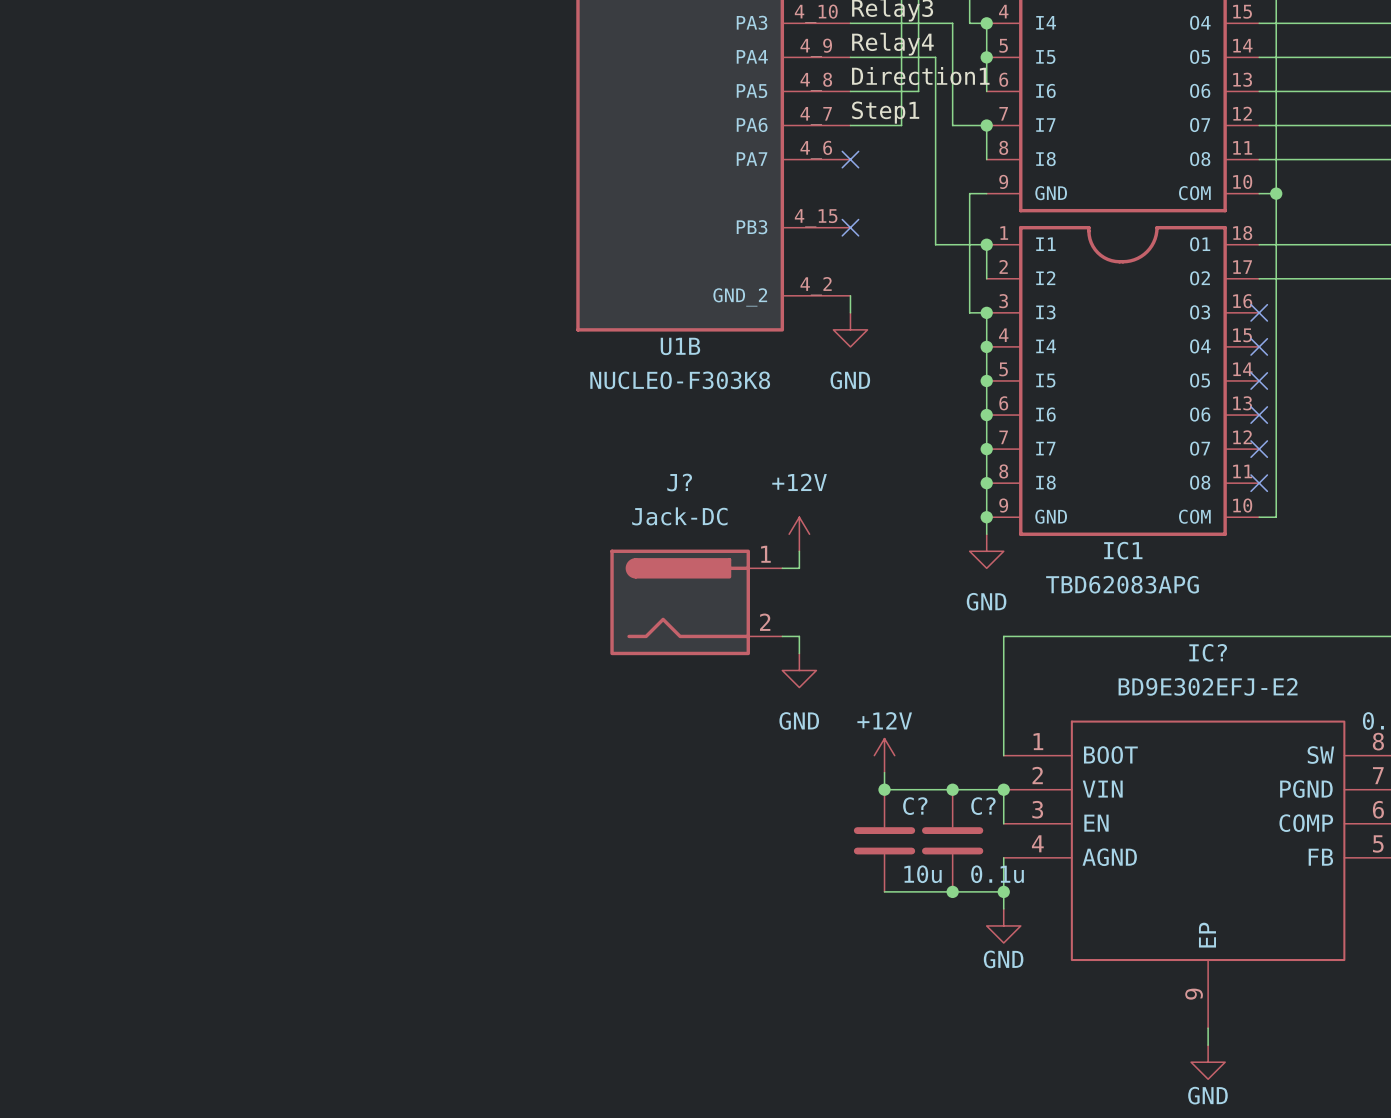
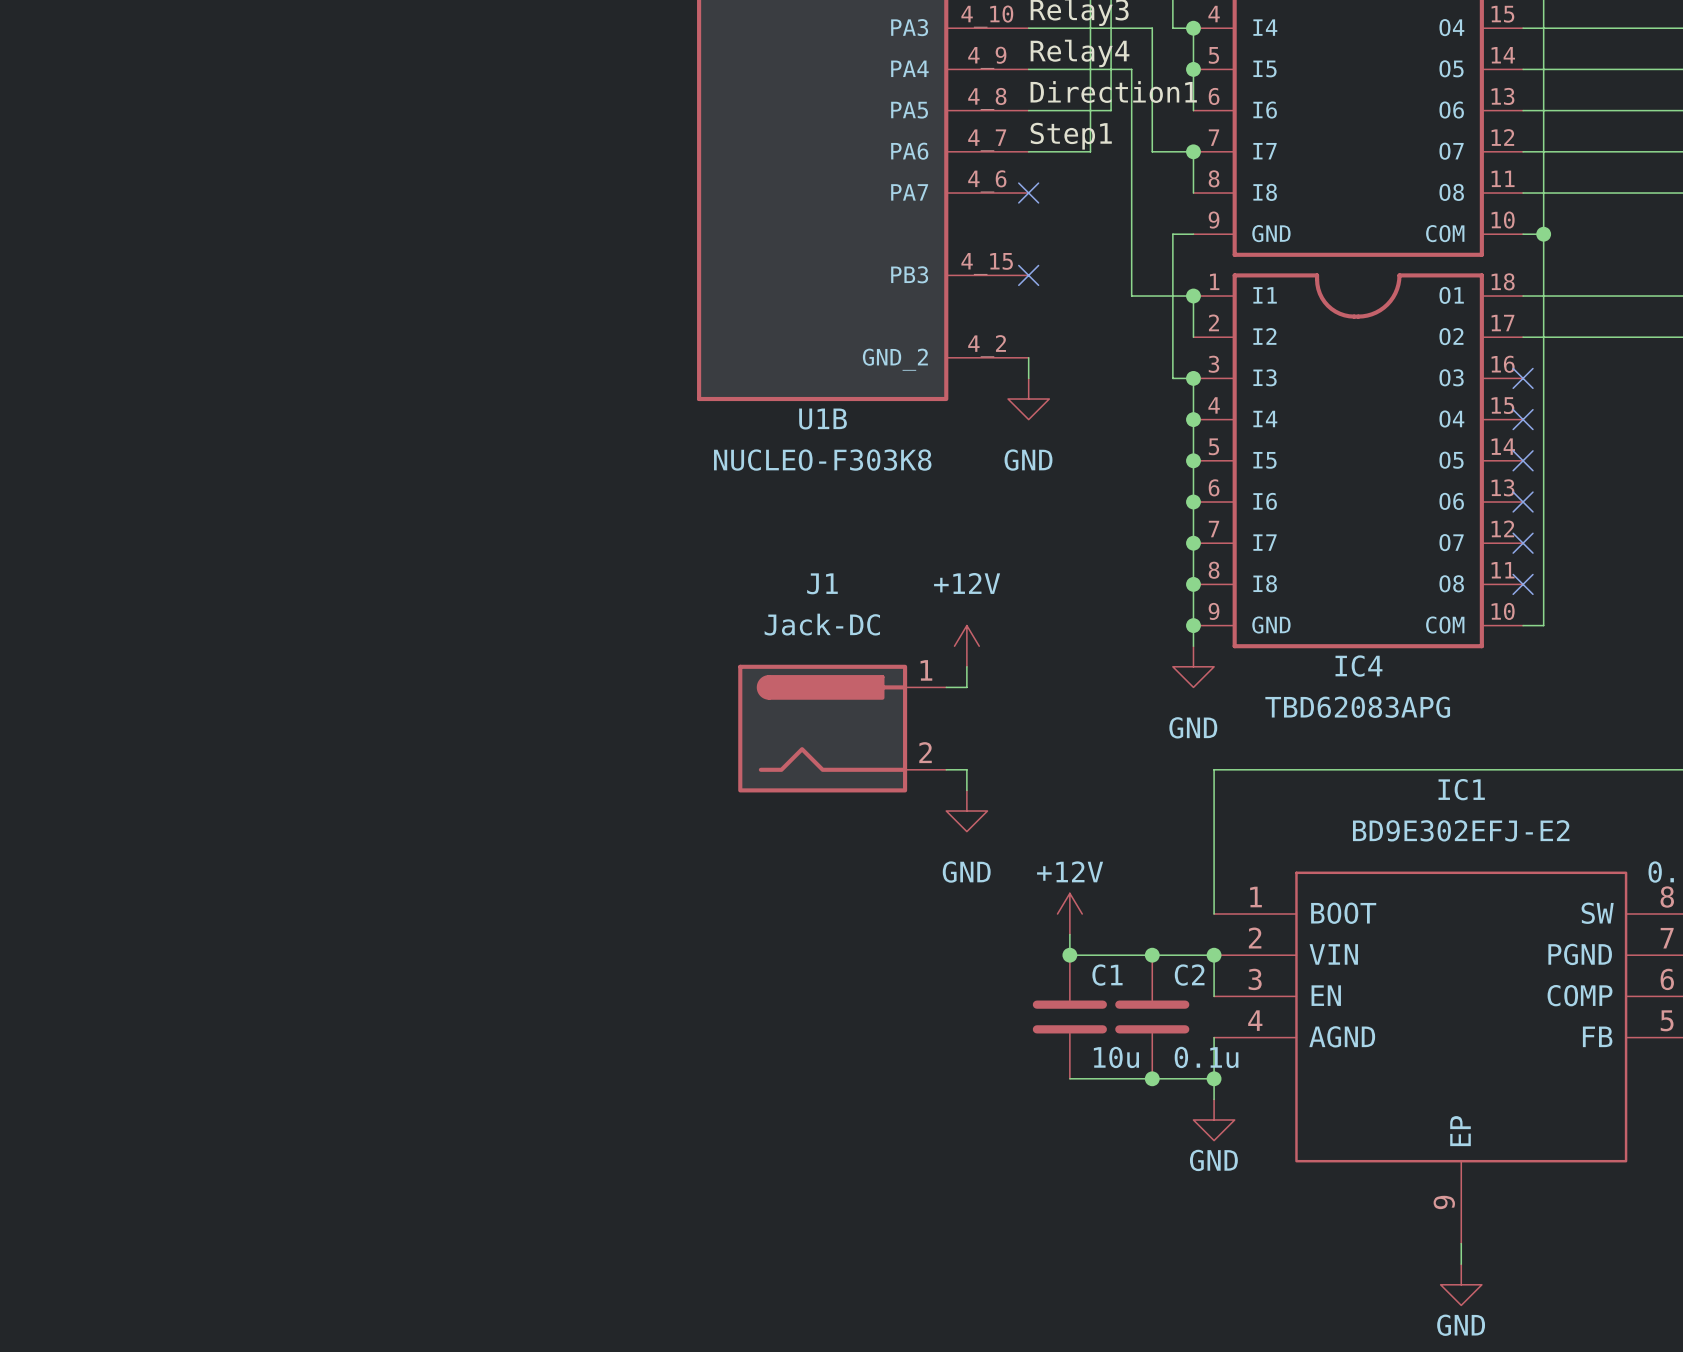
J? name: J? (679, 482) -> J1 (822, 583)
IC1 name: IC1 (1123, 550) -> IC4 (1358, 666)
IC? name: IC? (1208, 652) -> IC1 (1461, 789)
C? name: C? (915, 806) -> C1 (1107, 975)
C? name: C? (983, 806) -> C2 (1189, 975)

